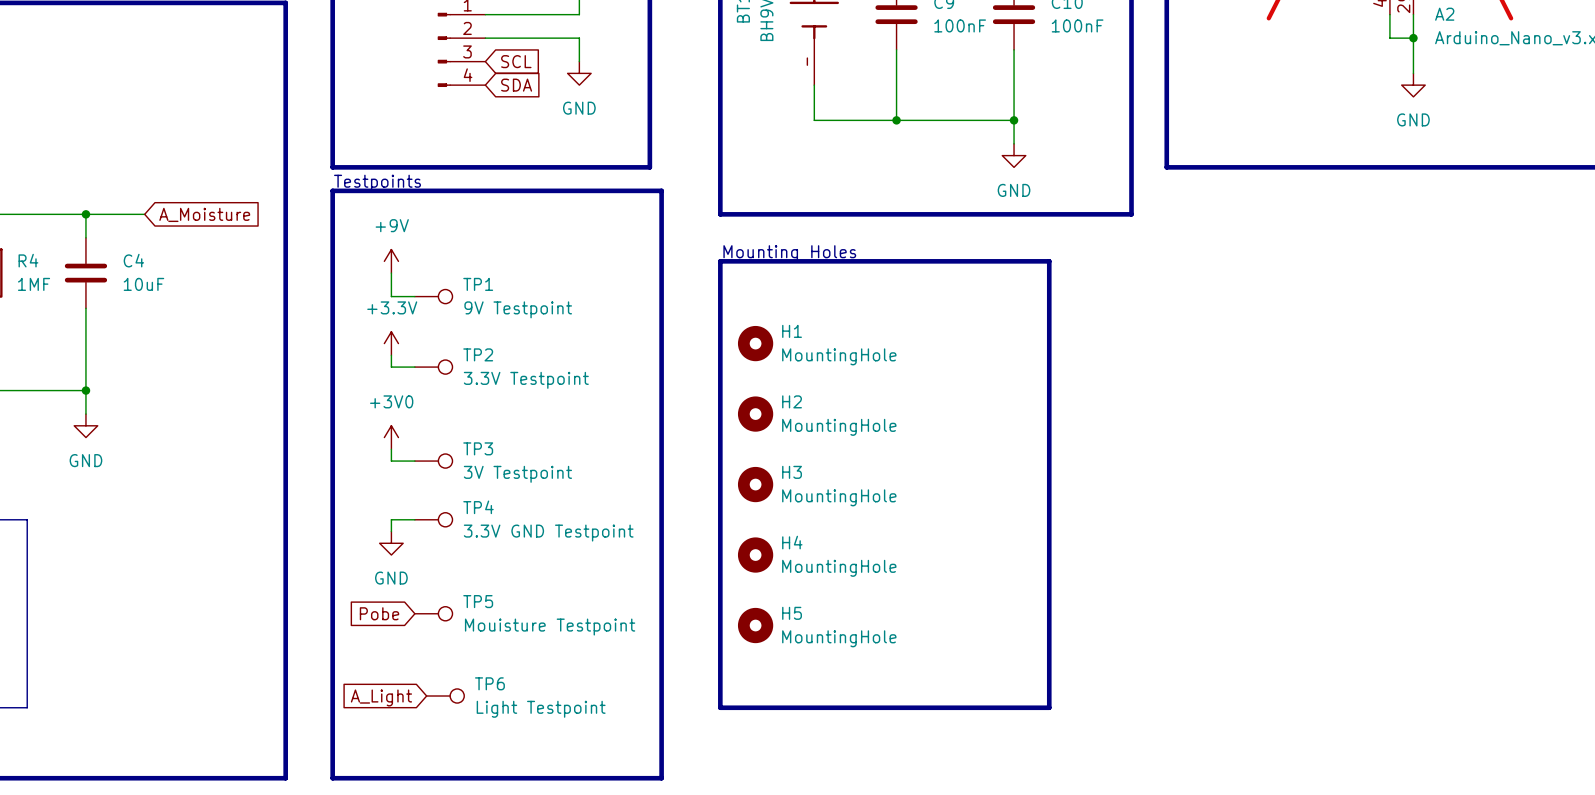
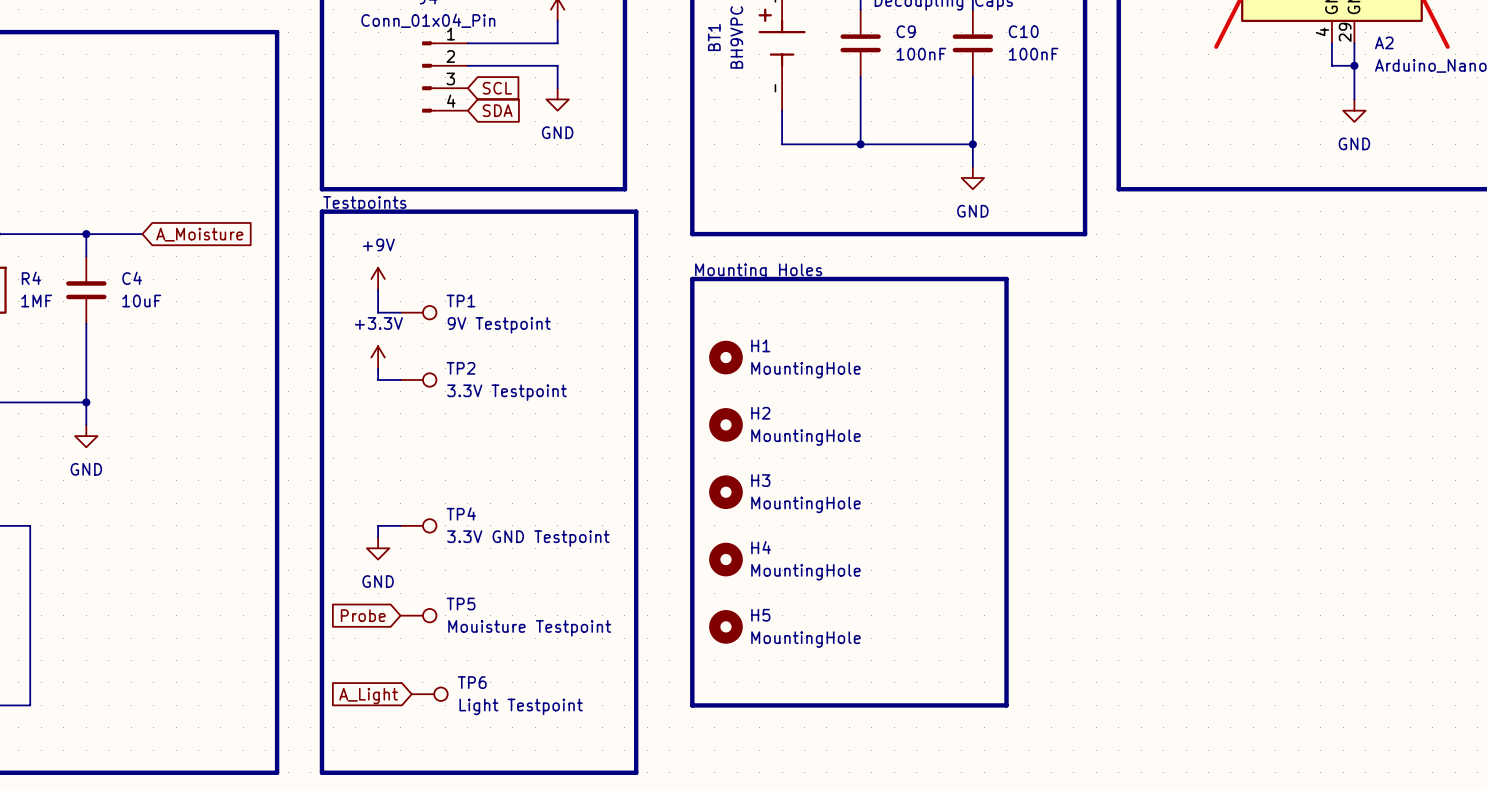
power symbol: +3V0 (391, 437) -> none
wire: (391, 449) (391, 461) (414, 461) -> none
TP3: 3V Testpoint (433, 461) -> none
global label: Pobe (379, 613) -> Probe (363, 615)

